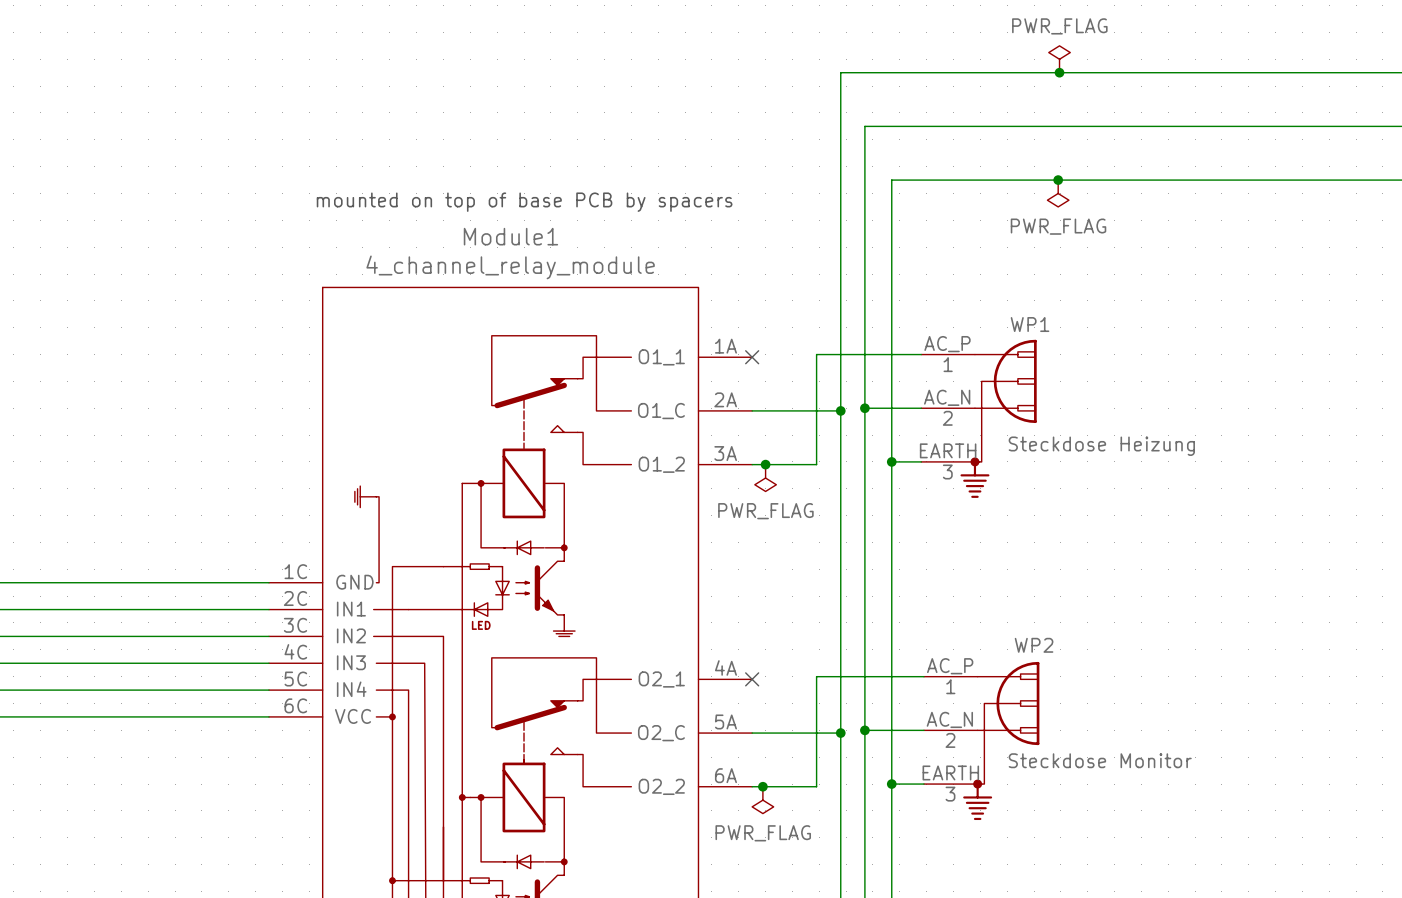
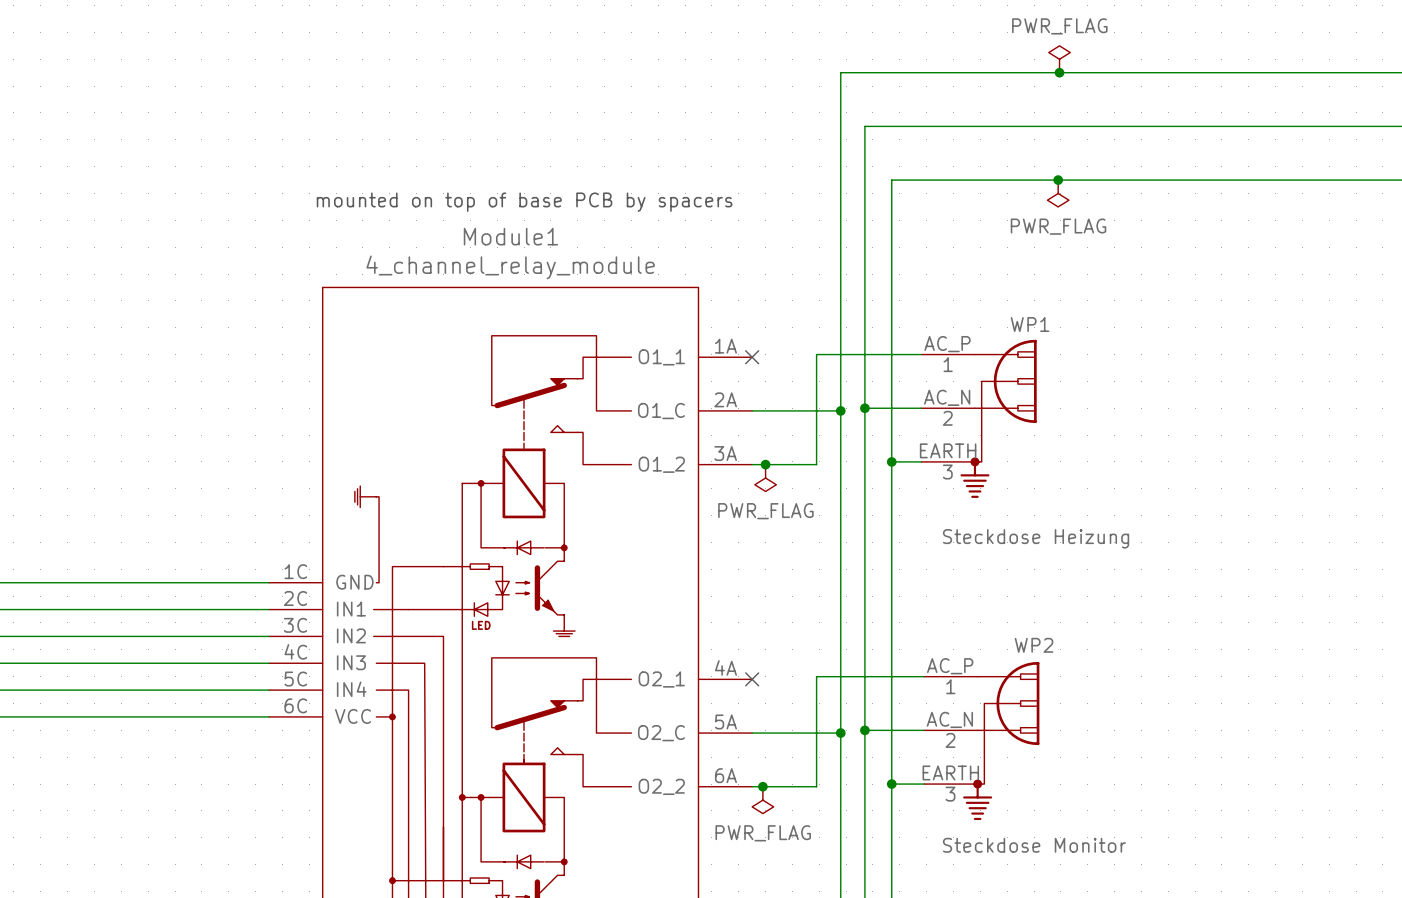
WP1 value position: Steckdose Heizung (1101, 446) -> Steckdose Heizung (1036, 538)
WP2 value position: Steckdose Monitor (1100, 760) -> Steckdose Monitor (1034, 845)

